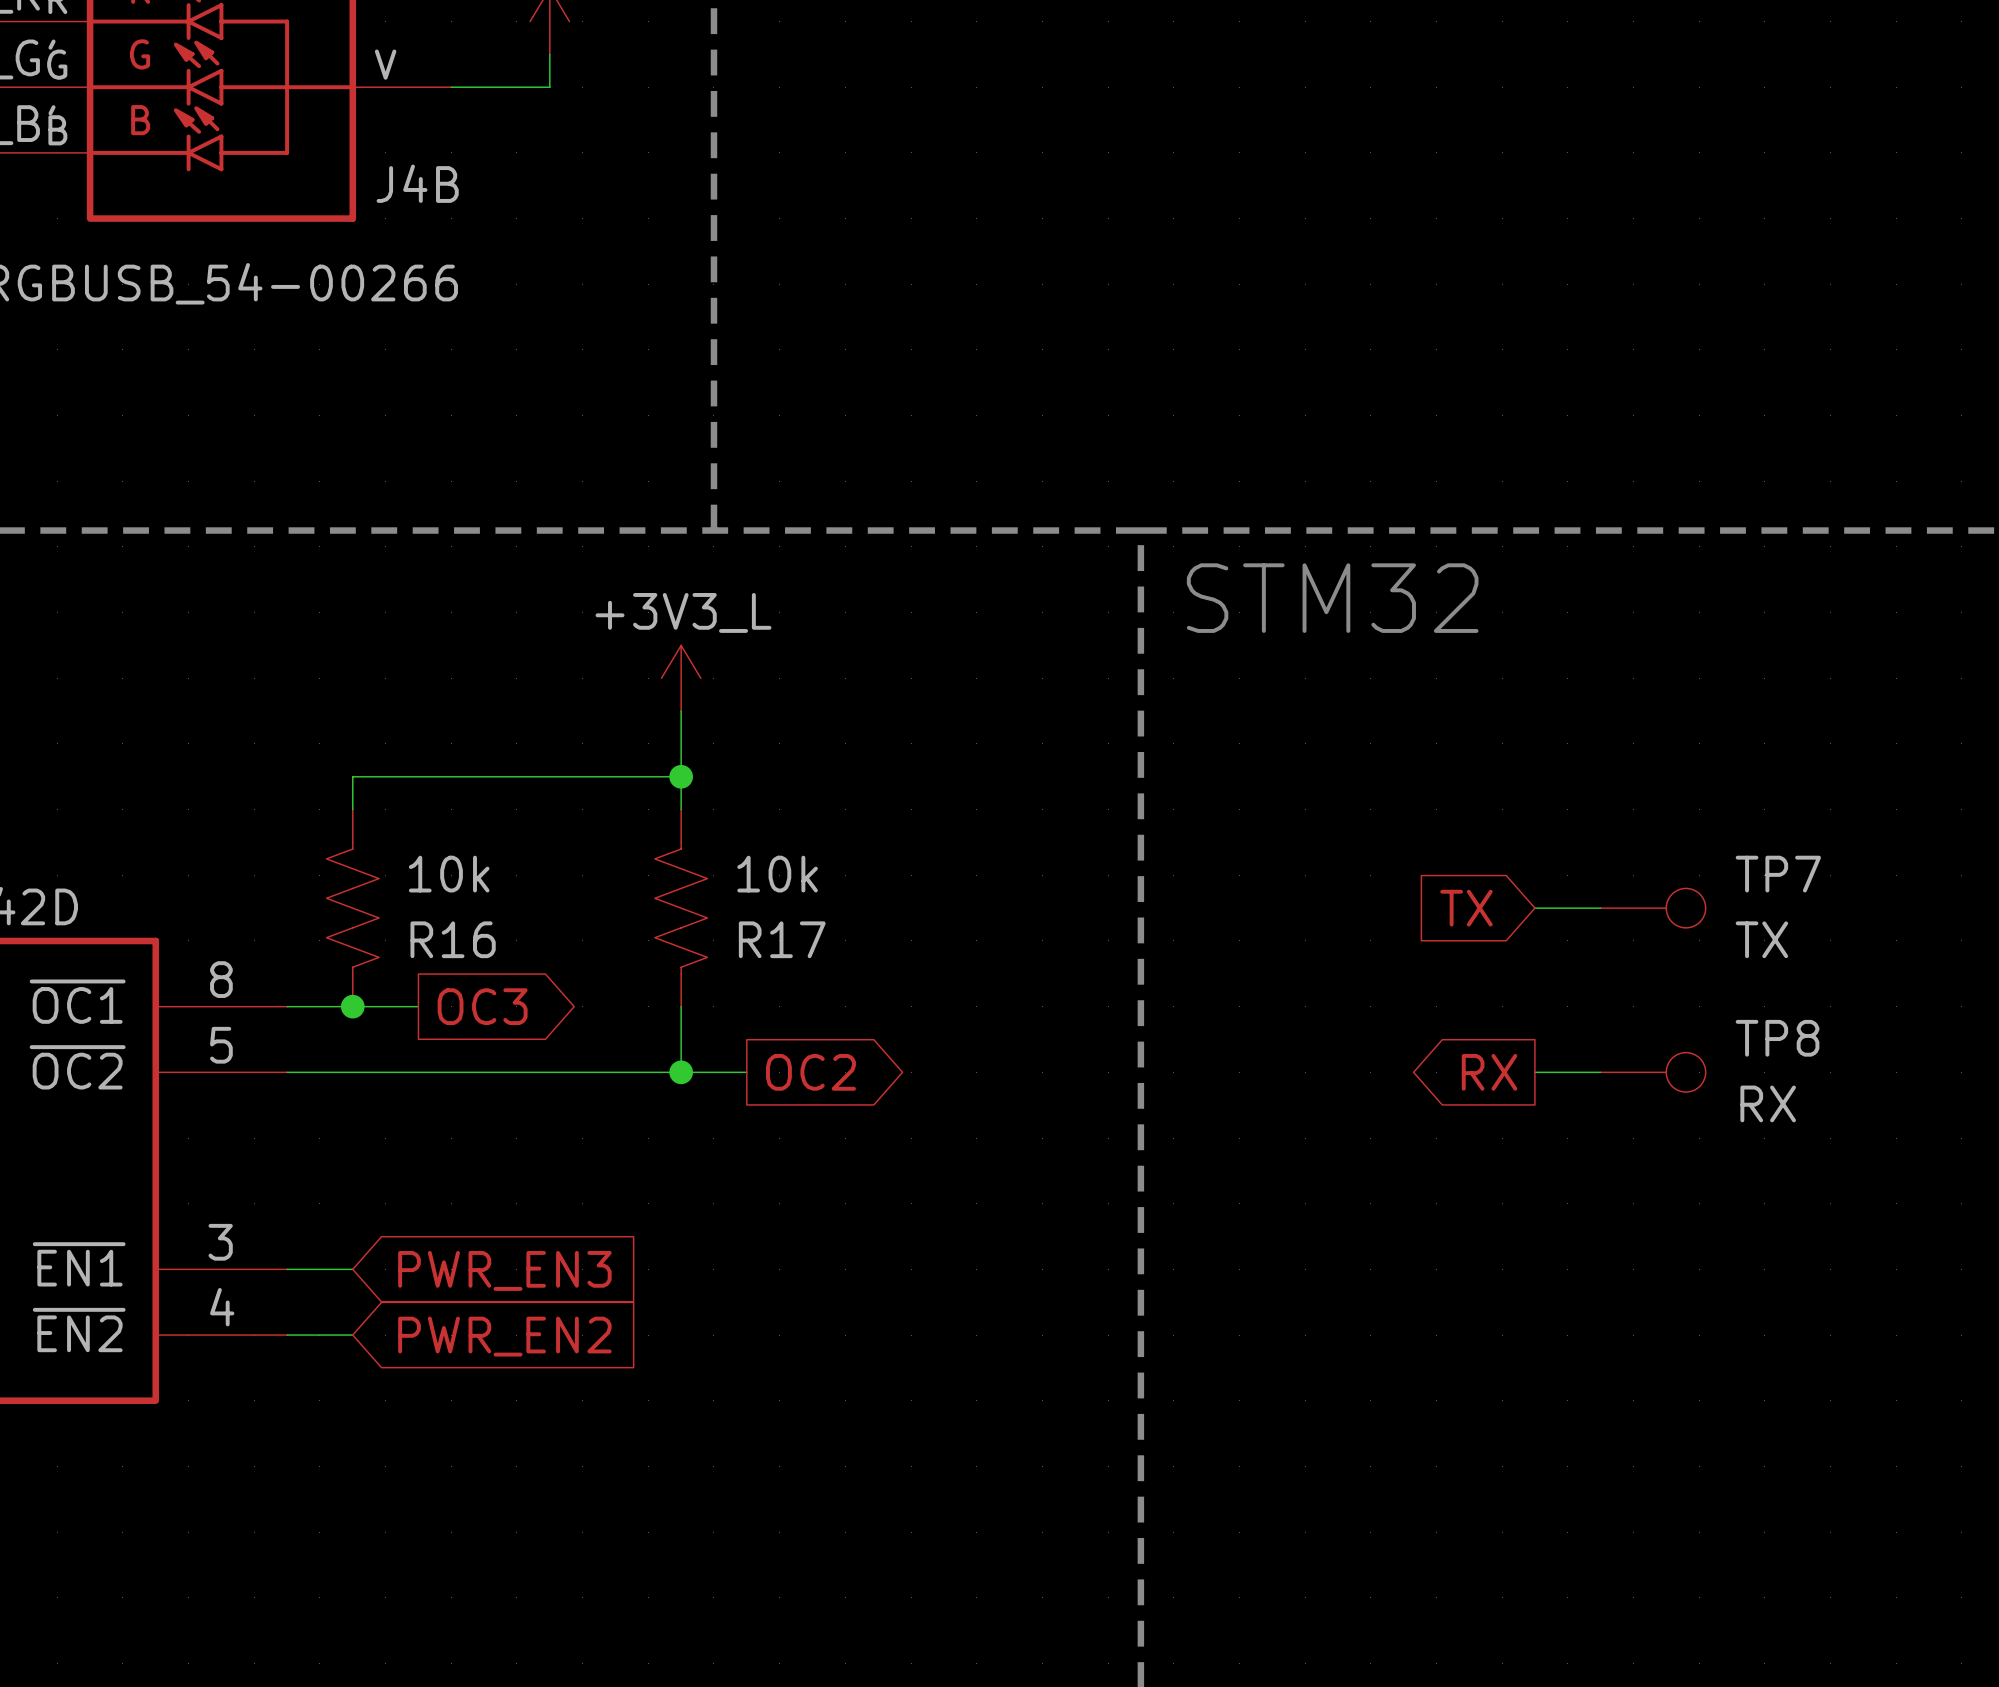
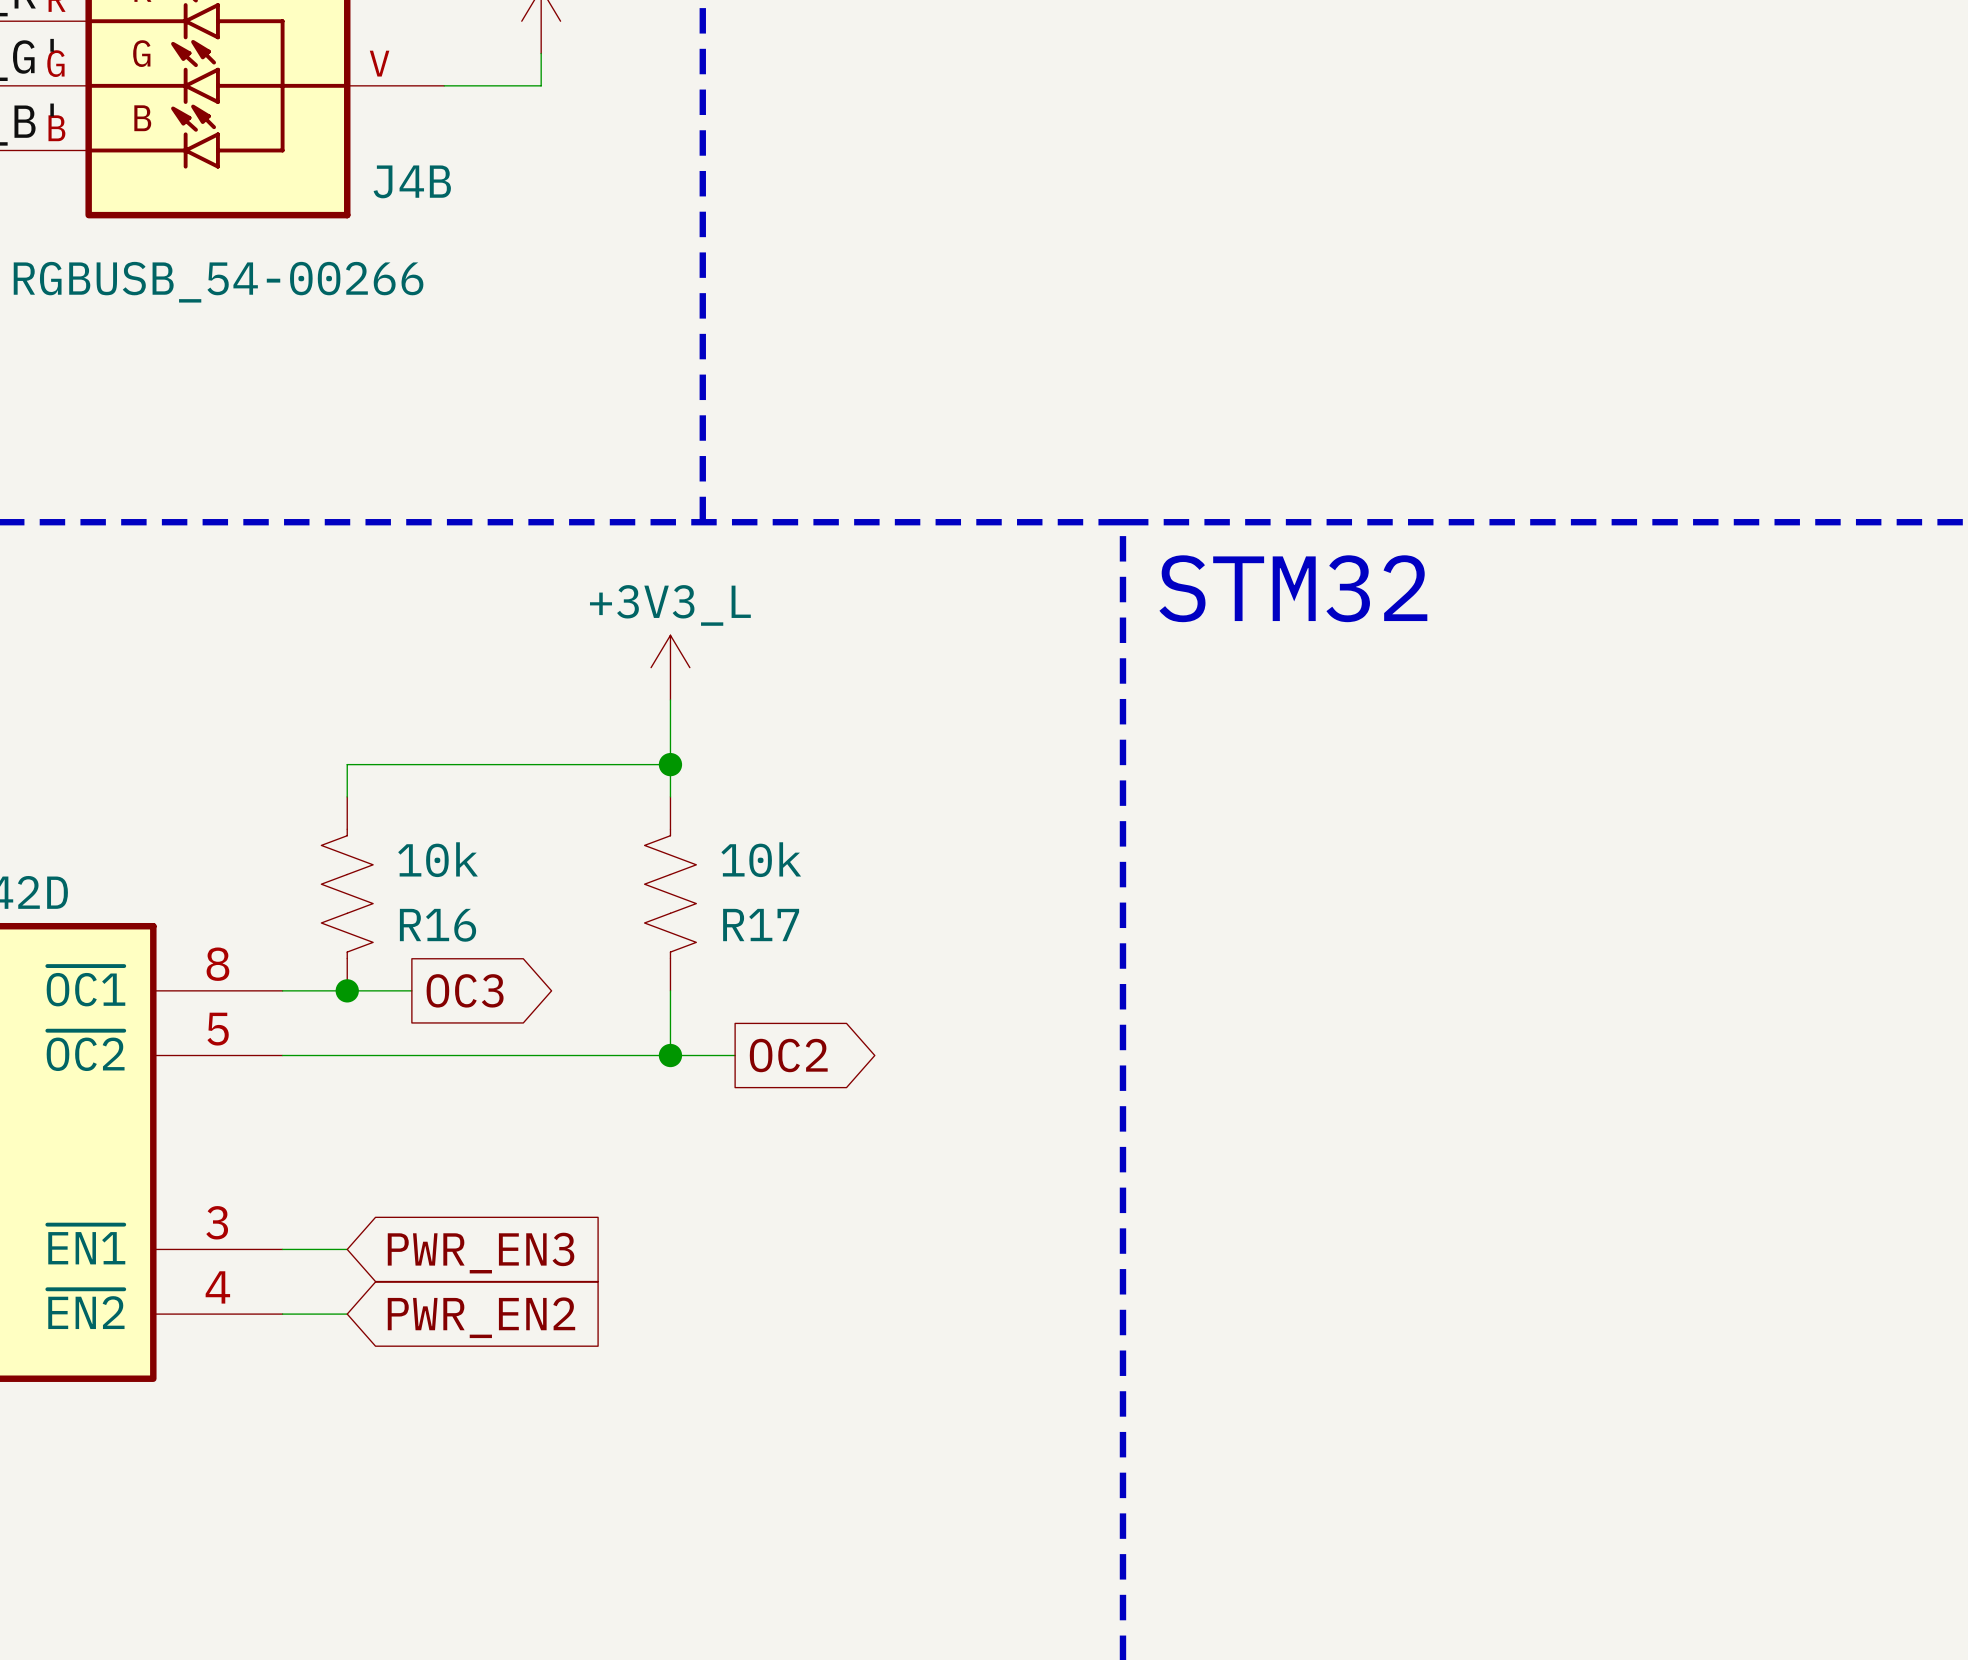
global label: TX (1466, 908) -> none
wire: (1534, 908) (1600, 908) -> none
TP7: TX (1653, 908) -> none
global label: RX (1489, 1072) -> none
wire: (1534, 1072) (1600, 1072) -> none
TP8: RX (1653, 1072) -> none

